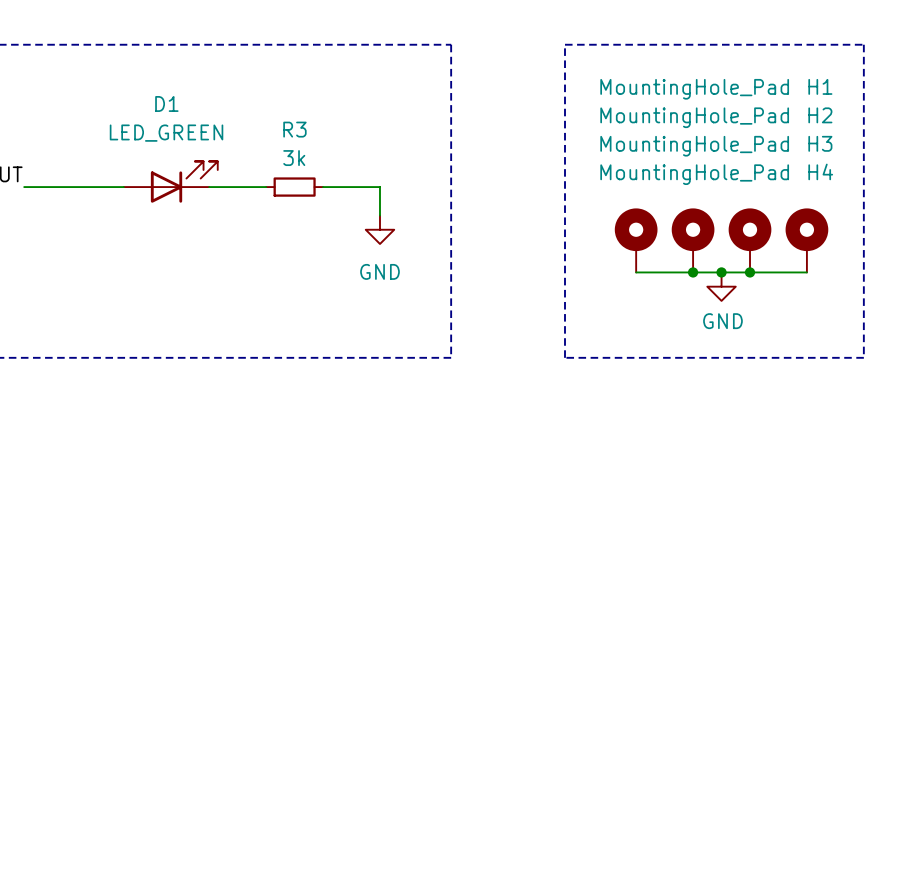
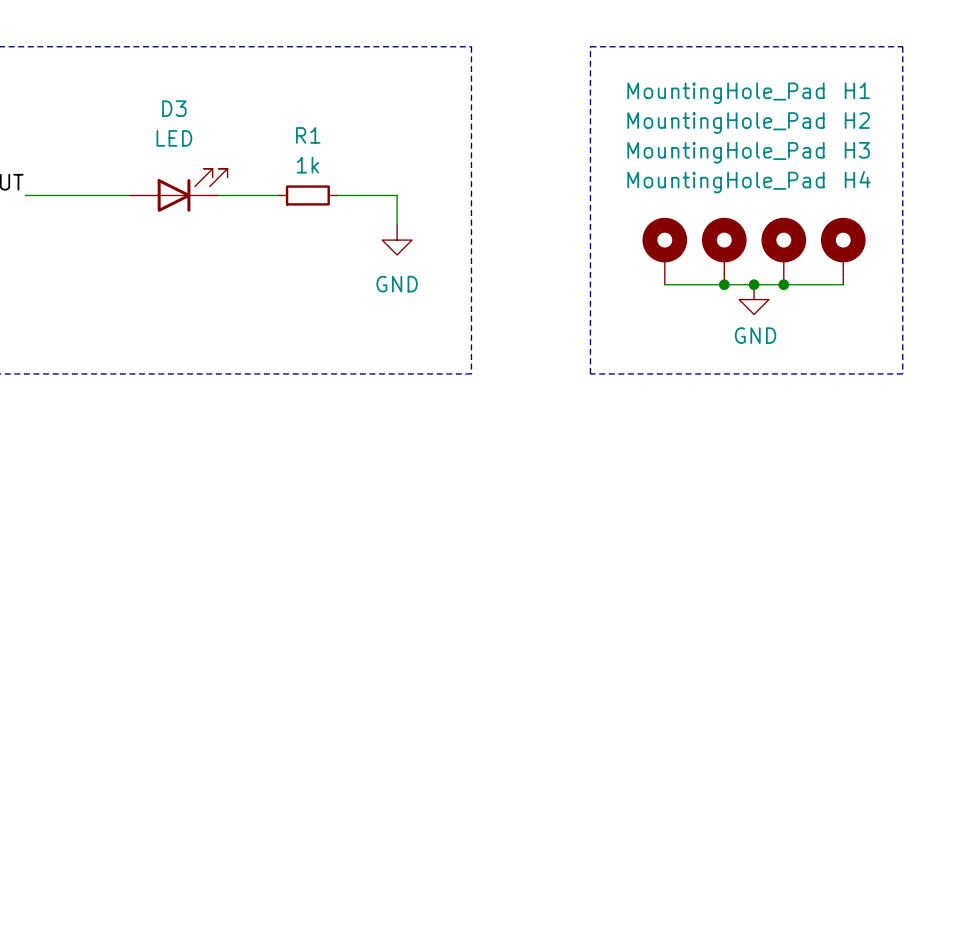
D1 name: D1 (166, 103) -> D3 (174, 108)
R3 name: R3 (294, 129) -> R1 (308, 135)
D1 value: LED_GREEN (166, 133) -> LED (174, 138)
R3 value: 3k (294, 158) -> 1k (307, 165)

